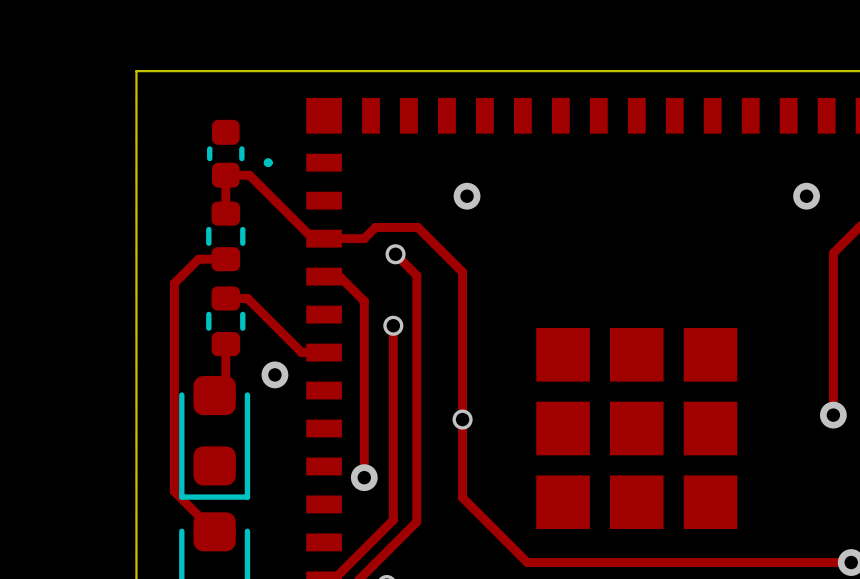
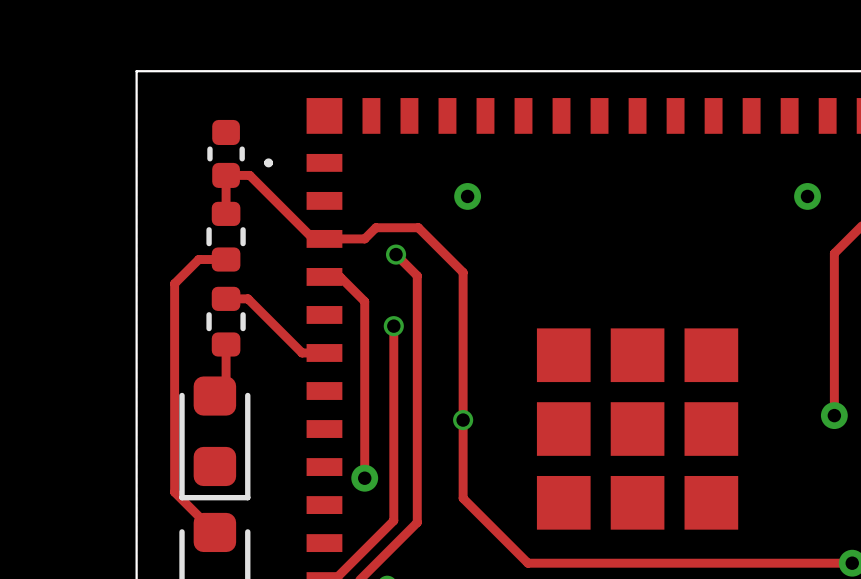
via: (274, 374) -> none

